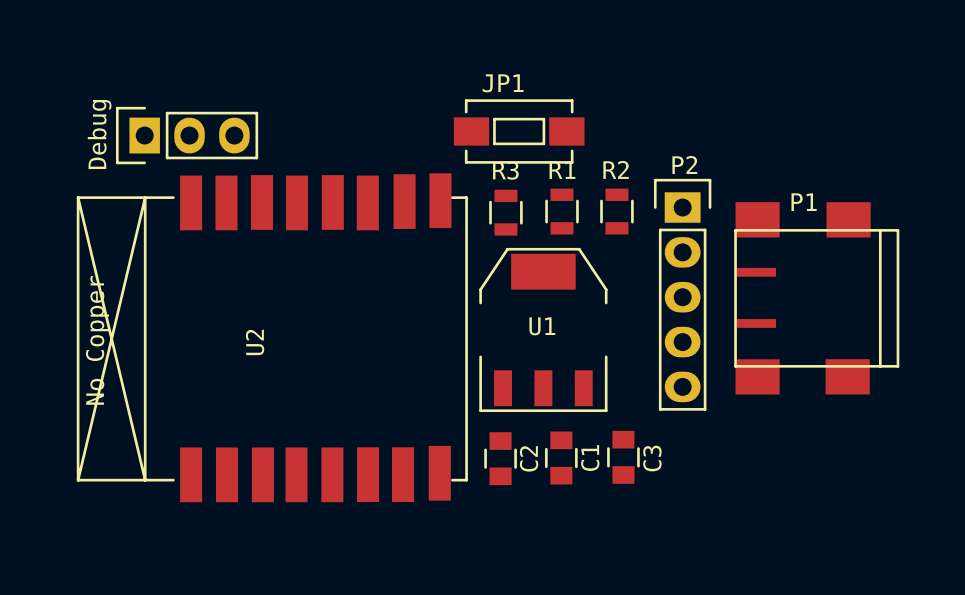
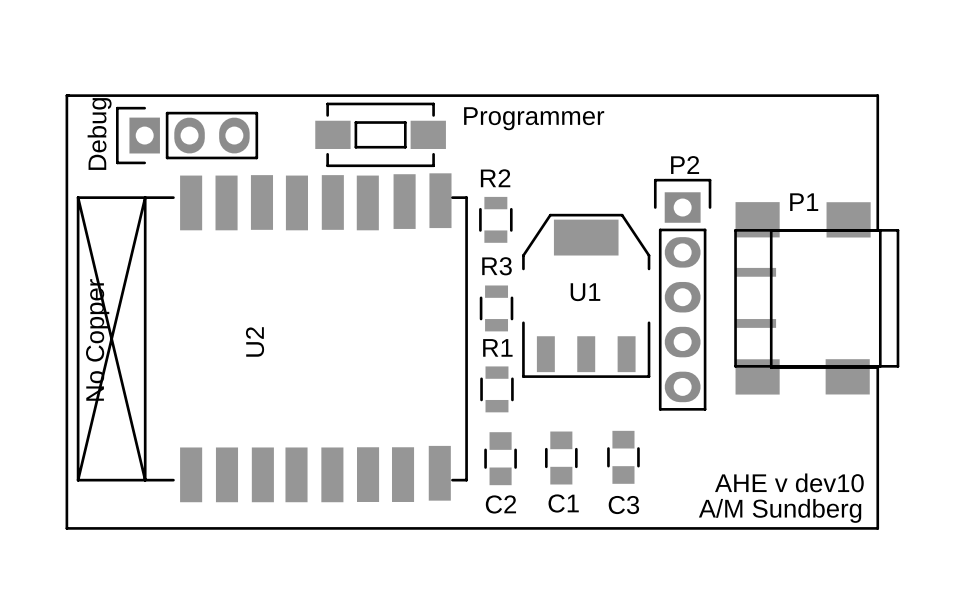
board edge: none -> (66, 95) (877, 95) (877, 230) (771, 230) (771, 367) (877, 367) (877, 528) (66, 528) (66, 95)
JP1: (519, 131) -> none
Programmer: none -> (380, 134)
R1 position: (562, 211) -> (496, 389)
R2 position: (616, 211) -> (495, 219)
R3 position: (505, 212) -> (496, 308)
U1 position: (543, 329) -> (586, 295)
C2 name rotation: 0° (529, 458) -> 90° clockwise (500, 504)
C2 name position: C2 (529, 458) -> C2 (500, 504)
C1 name rotation: 0° (590, 458) -> 90° clockwise (563, 503)
C1 name position: C1 (590, 458) -> C1 (563, 503)
C3 name rotation: 0° (652, 458) -> 90° clockwise (623, 505)
C3 name position: C3 (652, 458) -> C3 (623, 505)
text: none -> AHE v dev10 (789, 482)
text: none -> A/M Sundberg (780, 510)

